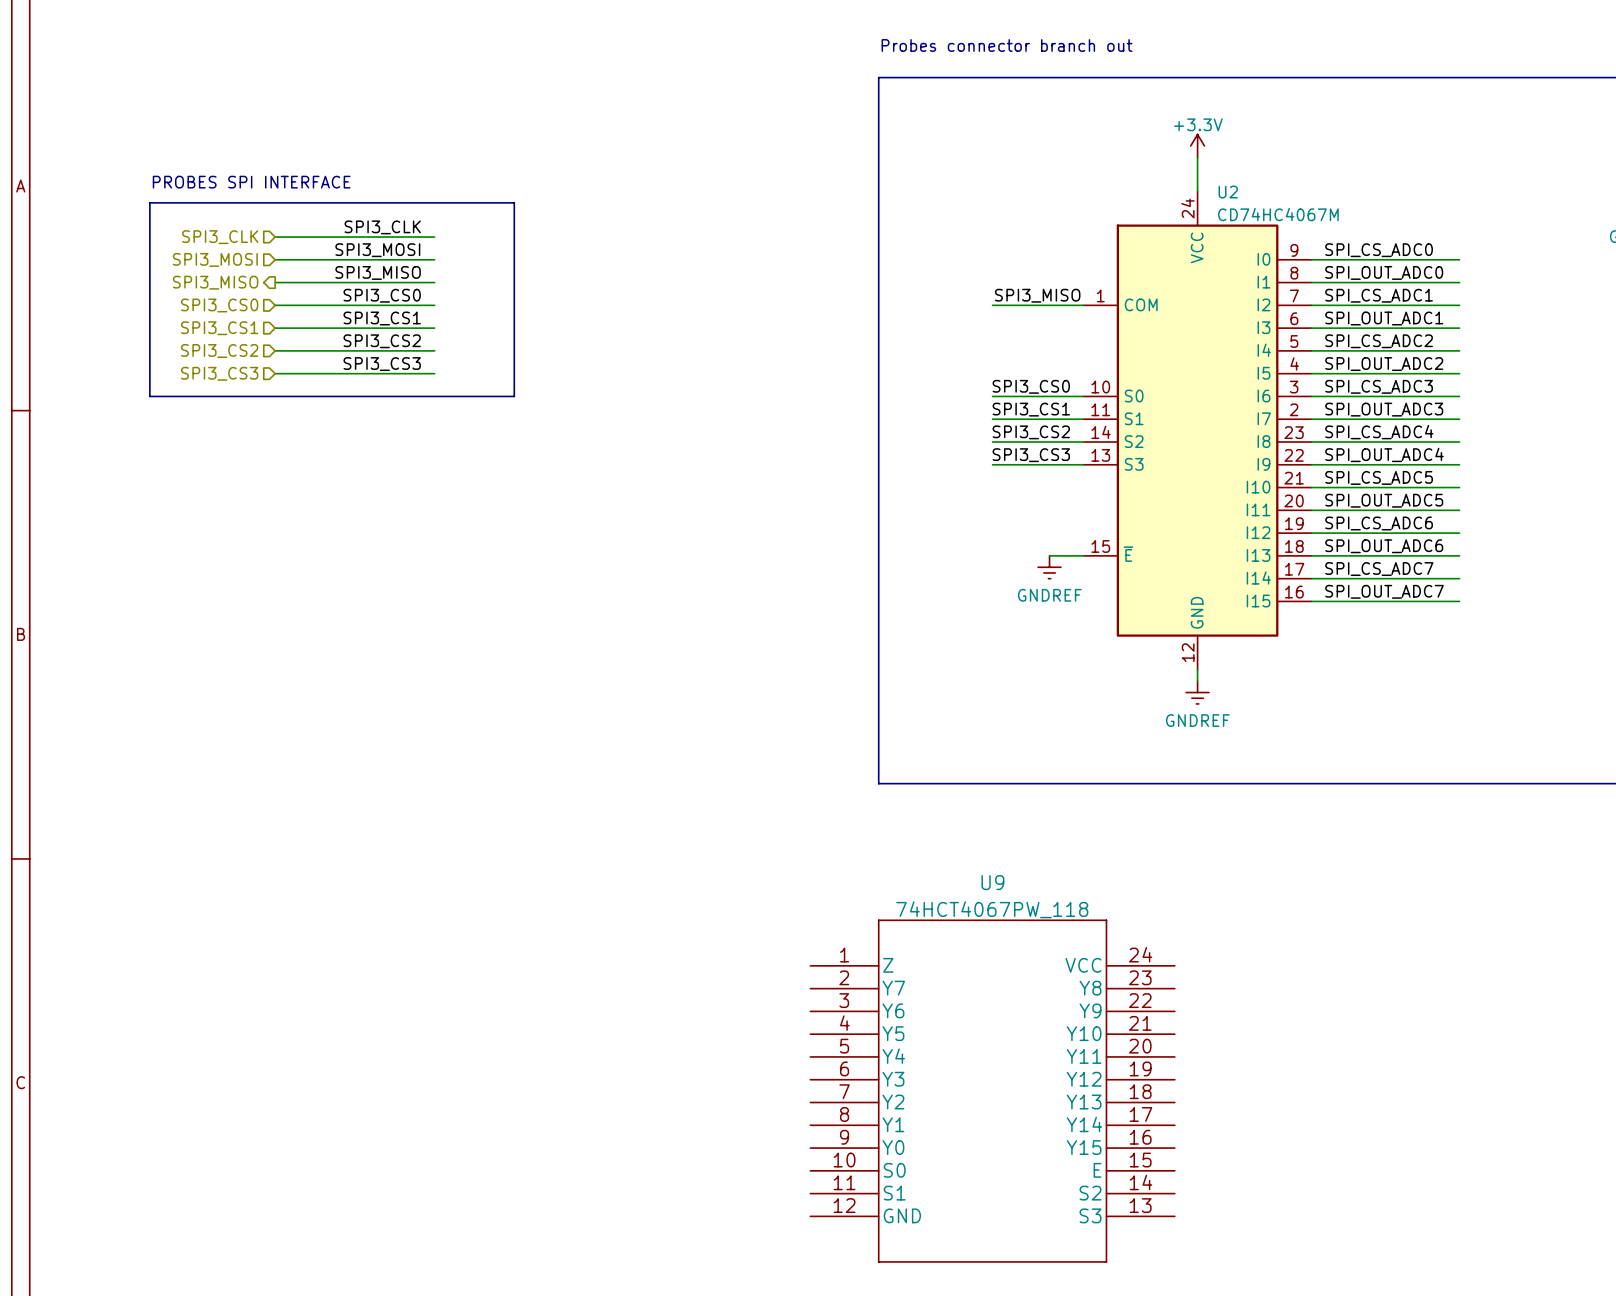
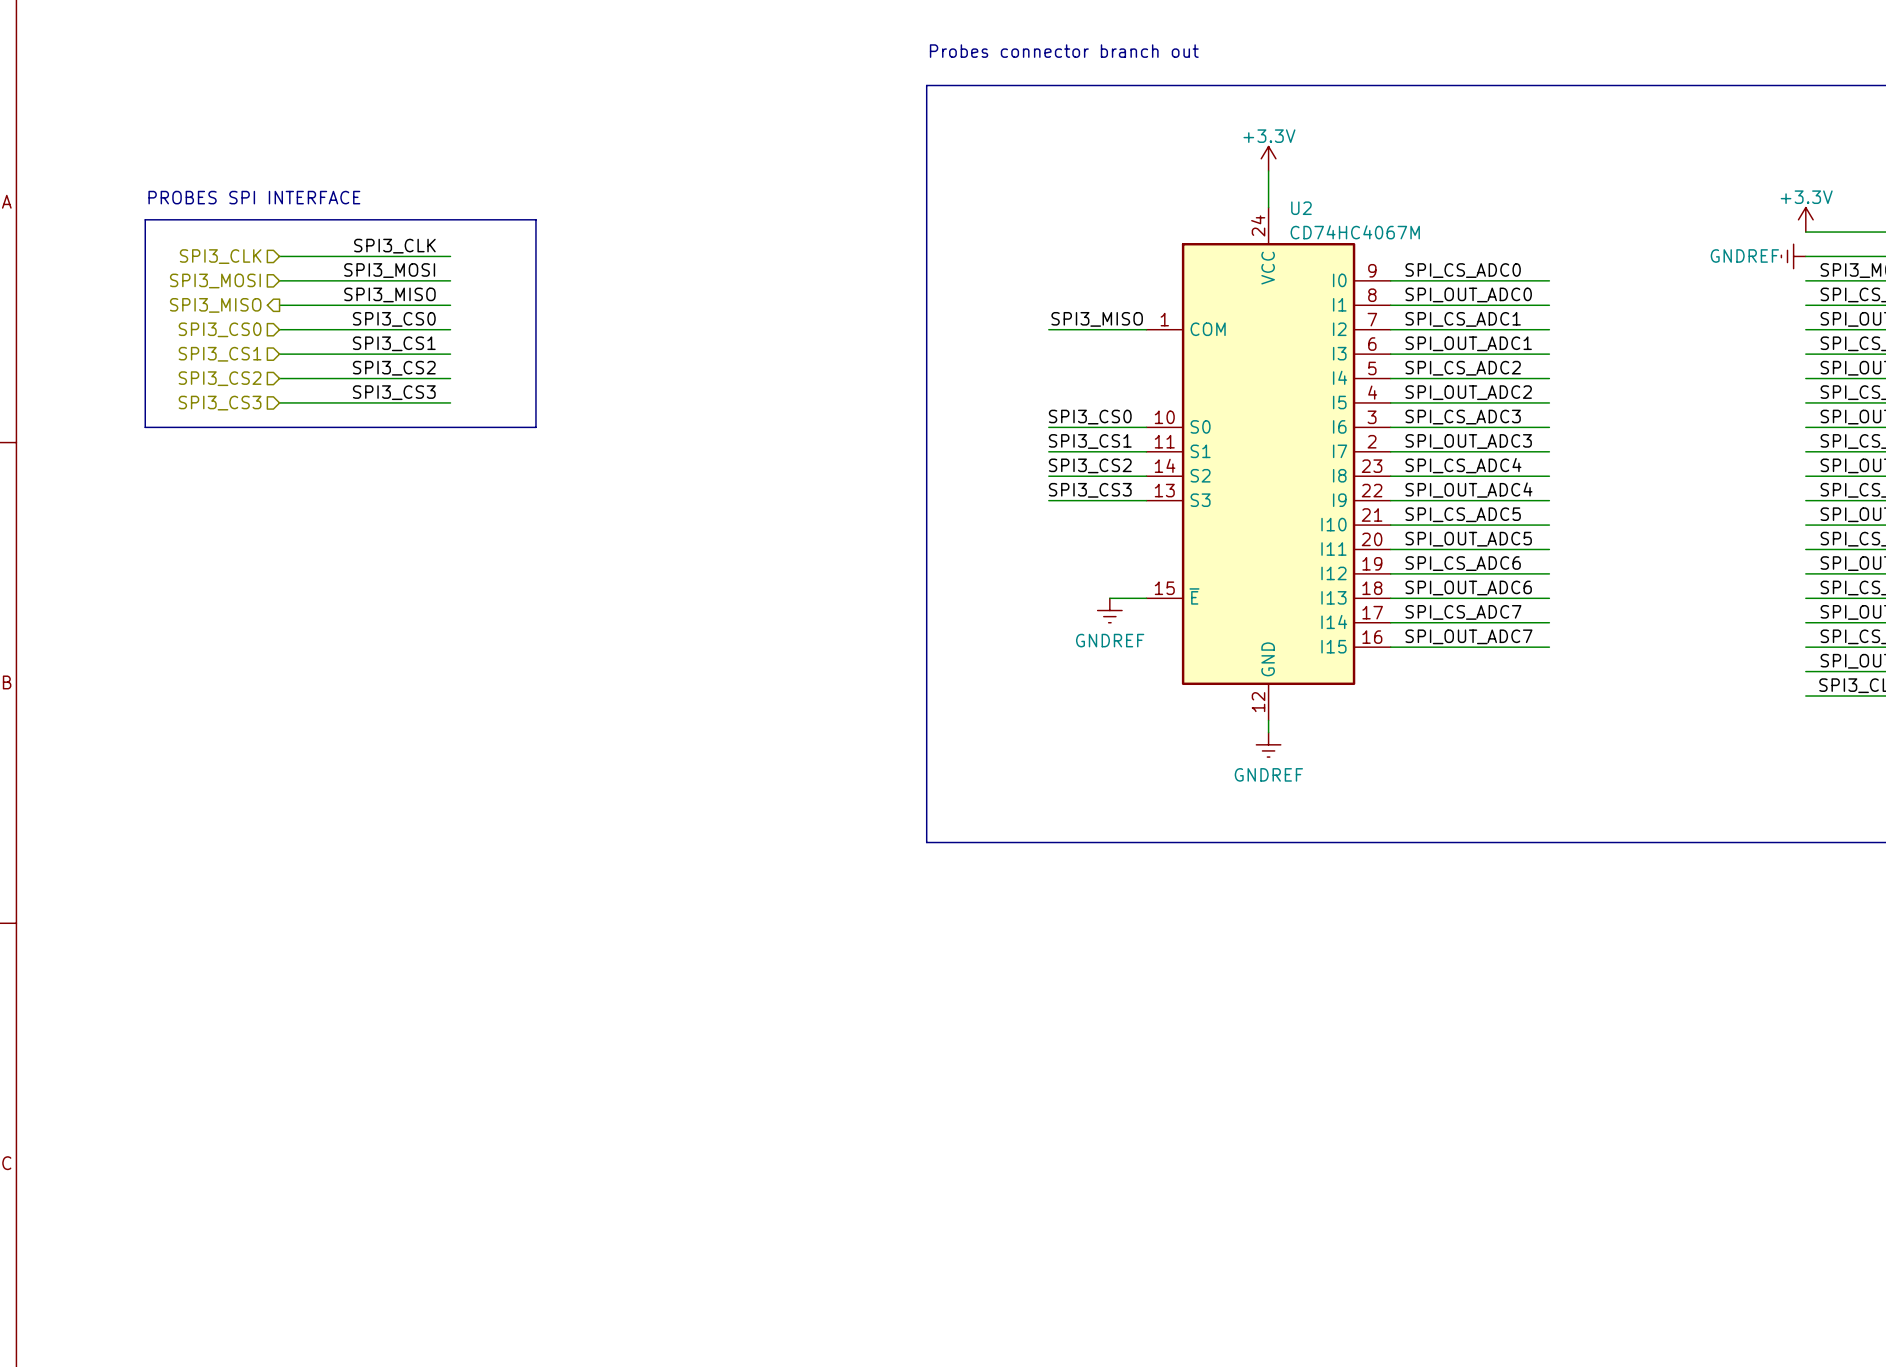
U9: 74HCT4067PW_118 (992, 1091) -> none

